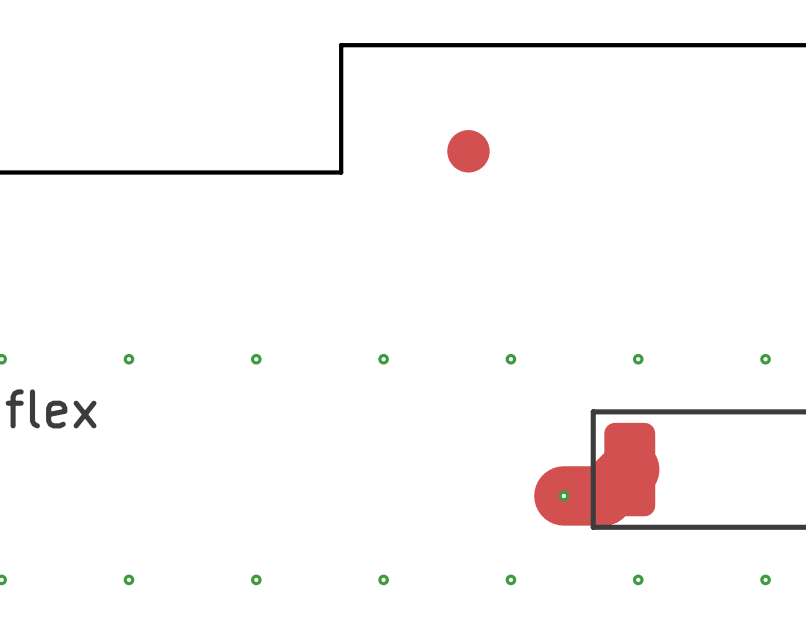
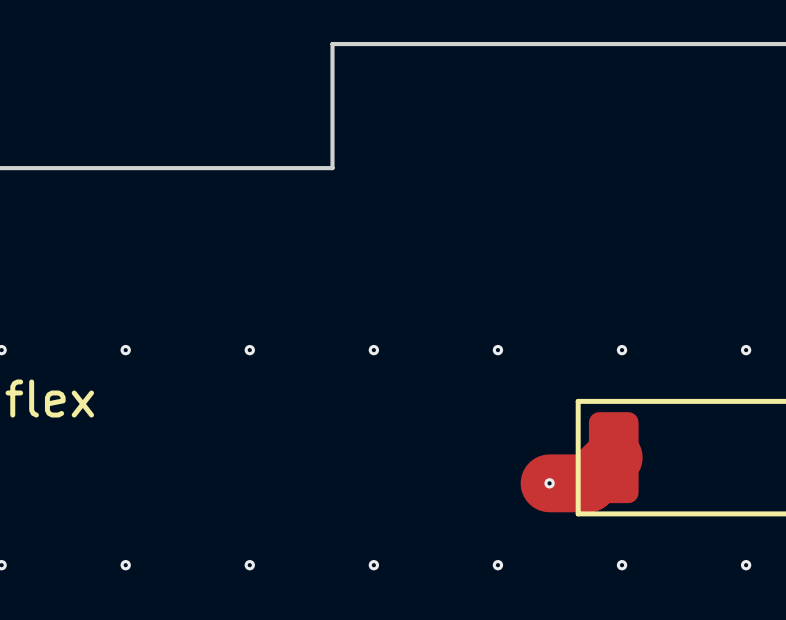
part: (468, 151) -> none

